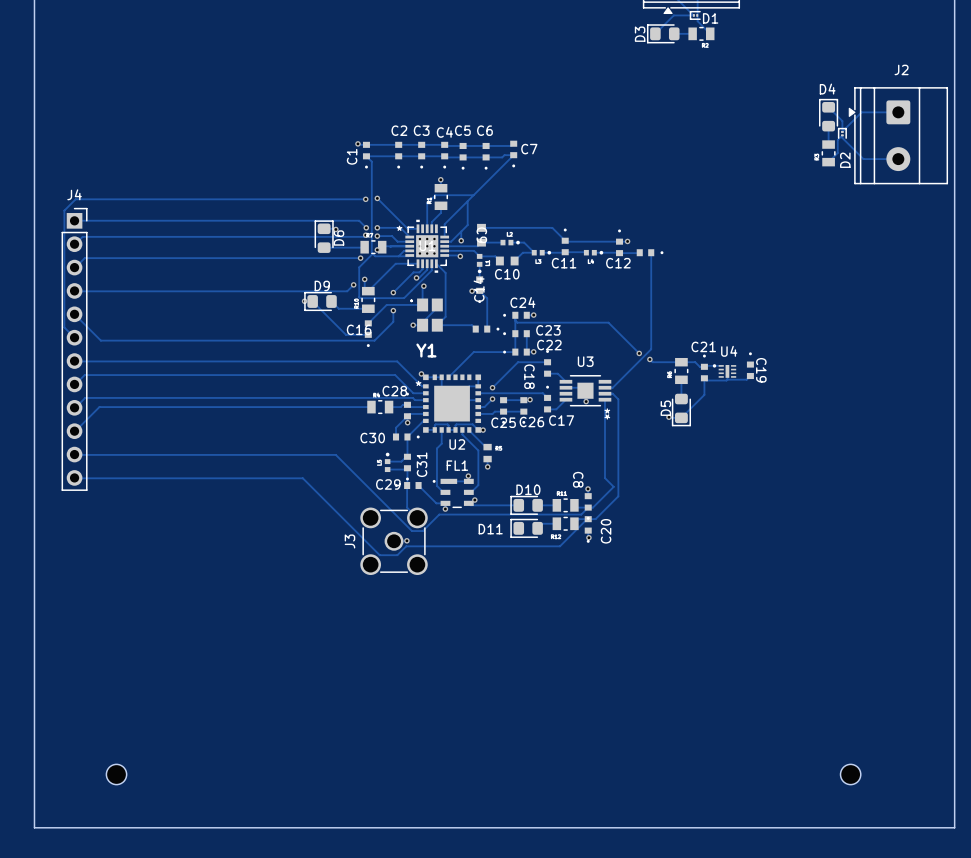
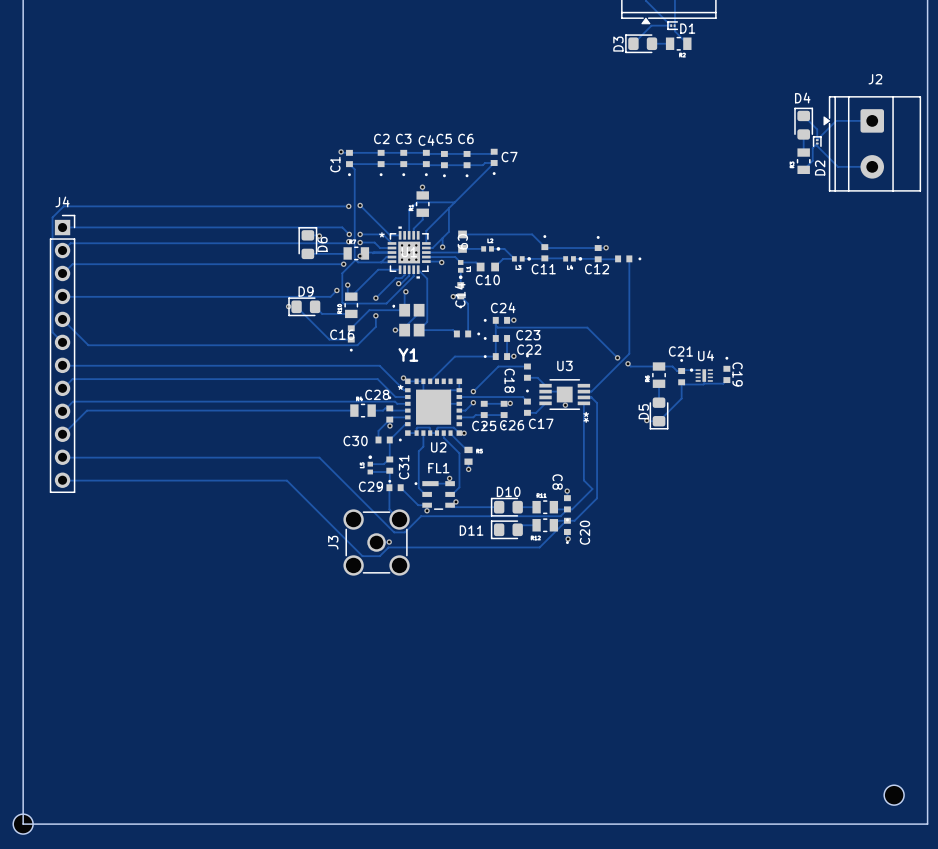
part position: (116, 774) -> (23, 824)
part position: (850, 774) -> (894, 795)

